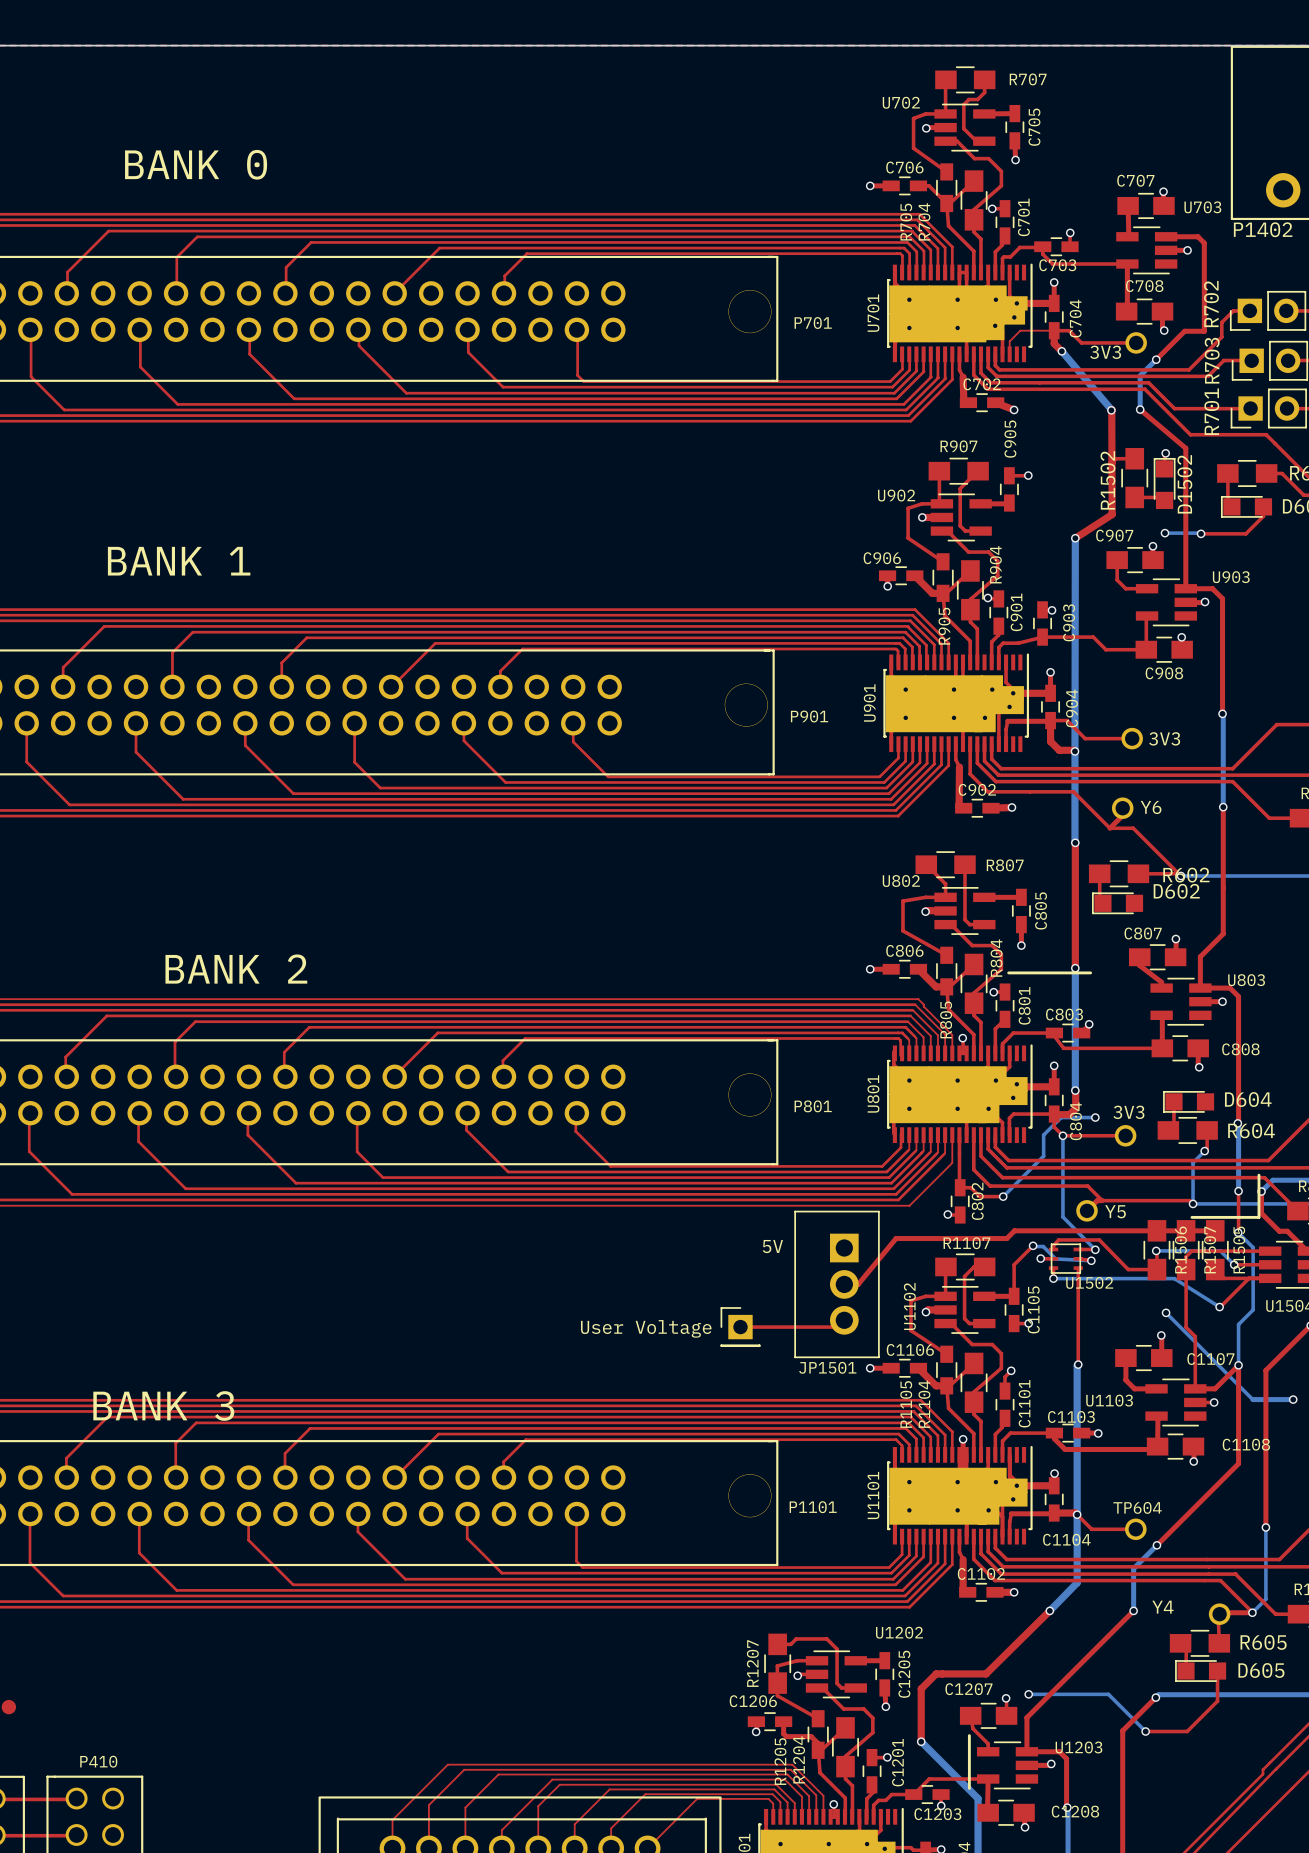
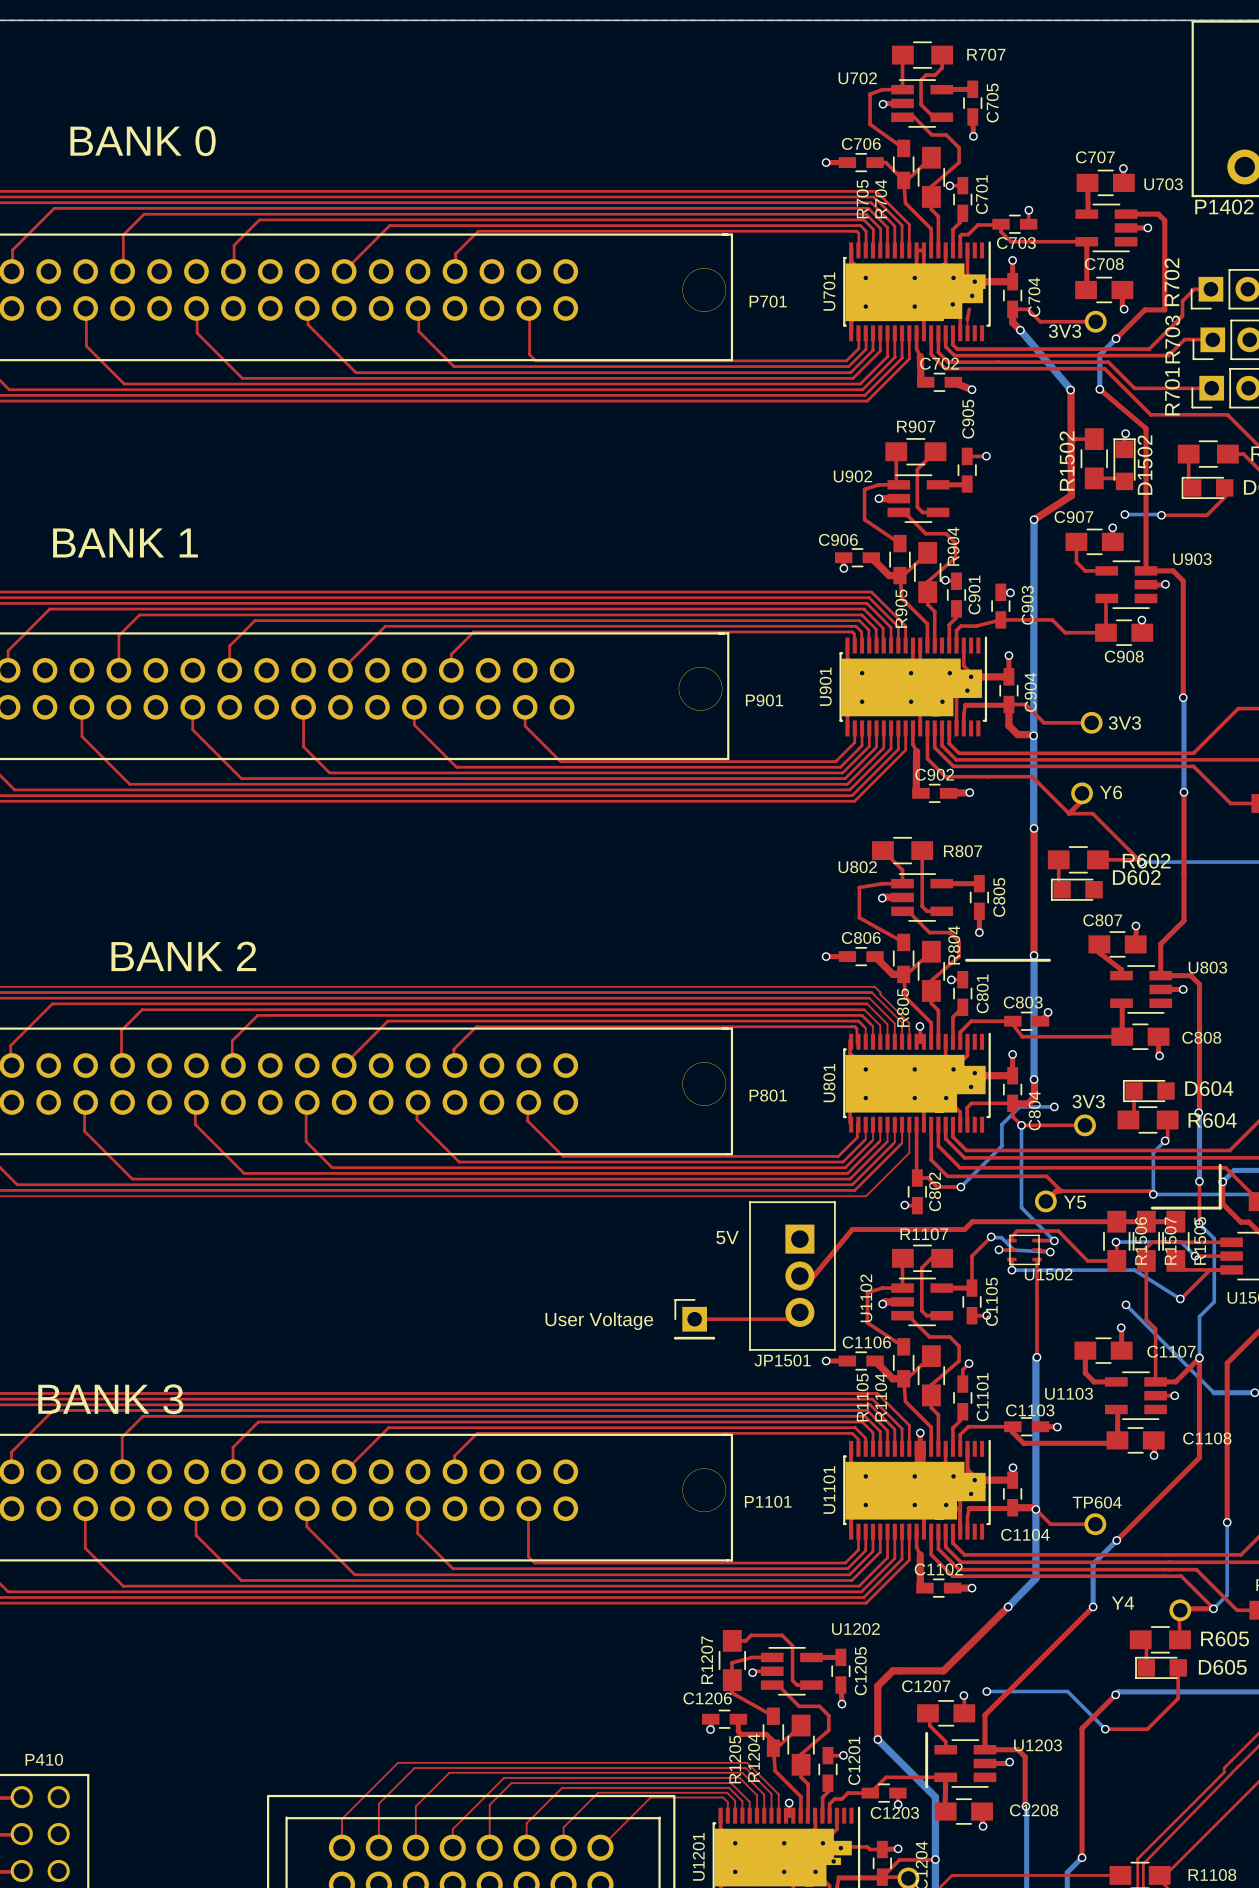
top track: (1054, 330) (1020, 330) (1009, 341) -> (969, 309) (967, 320)

